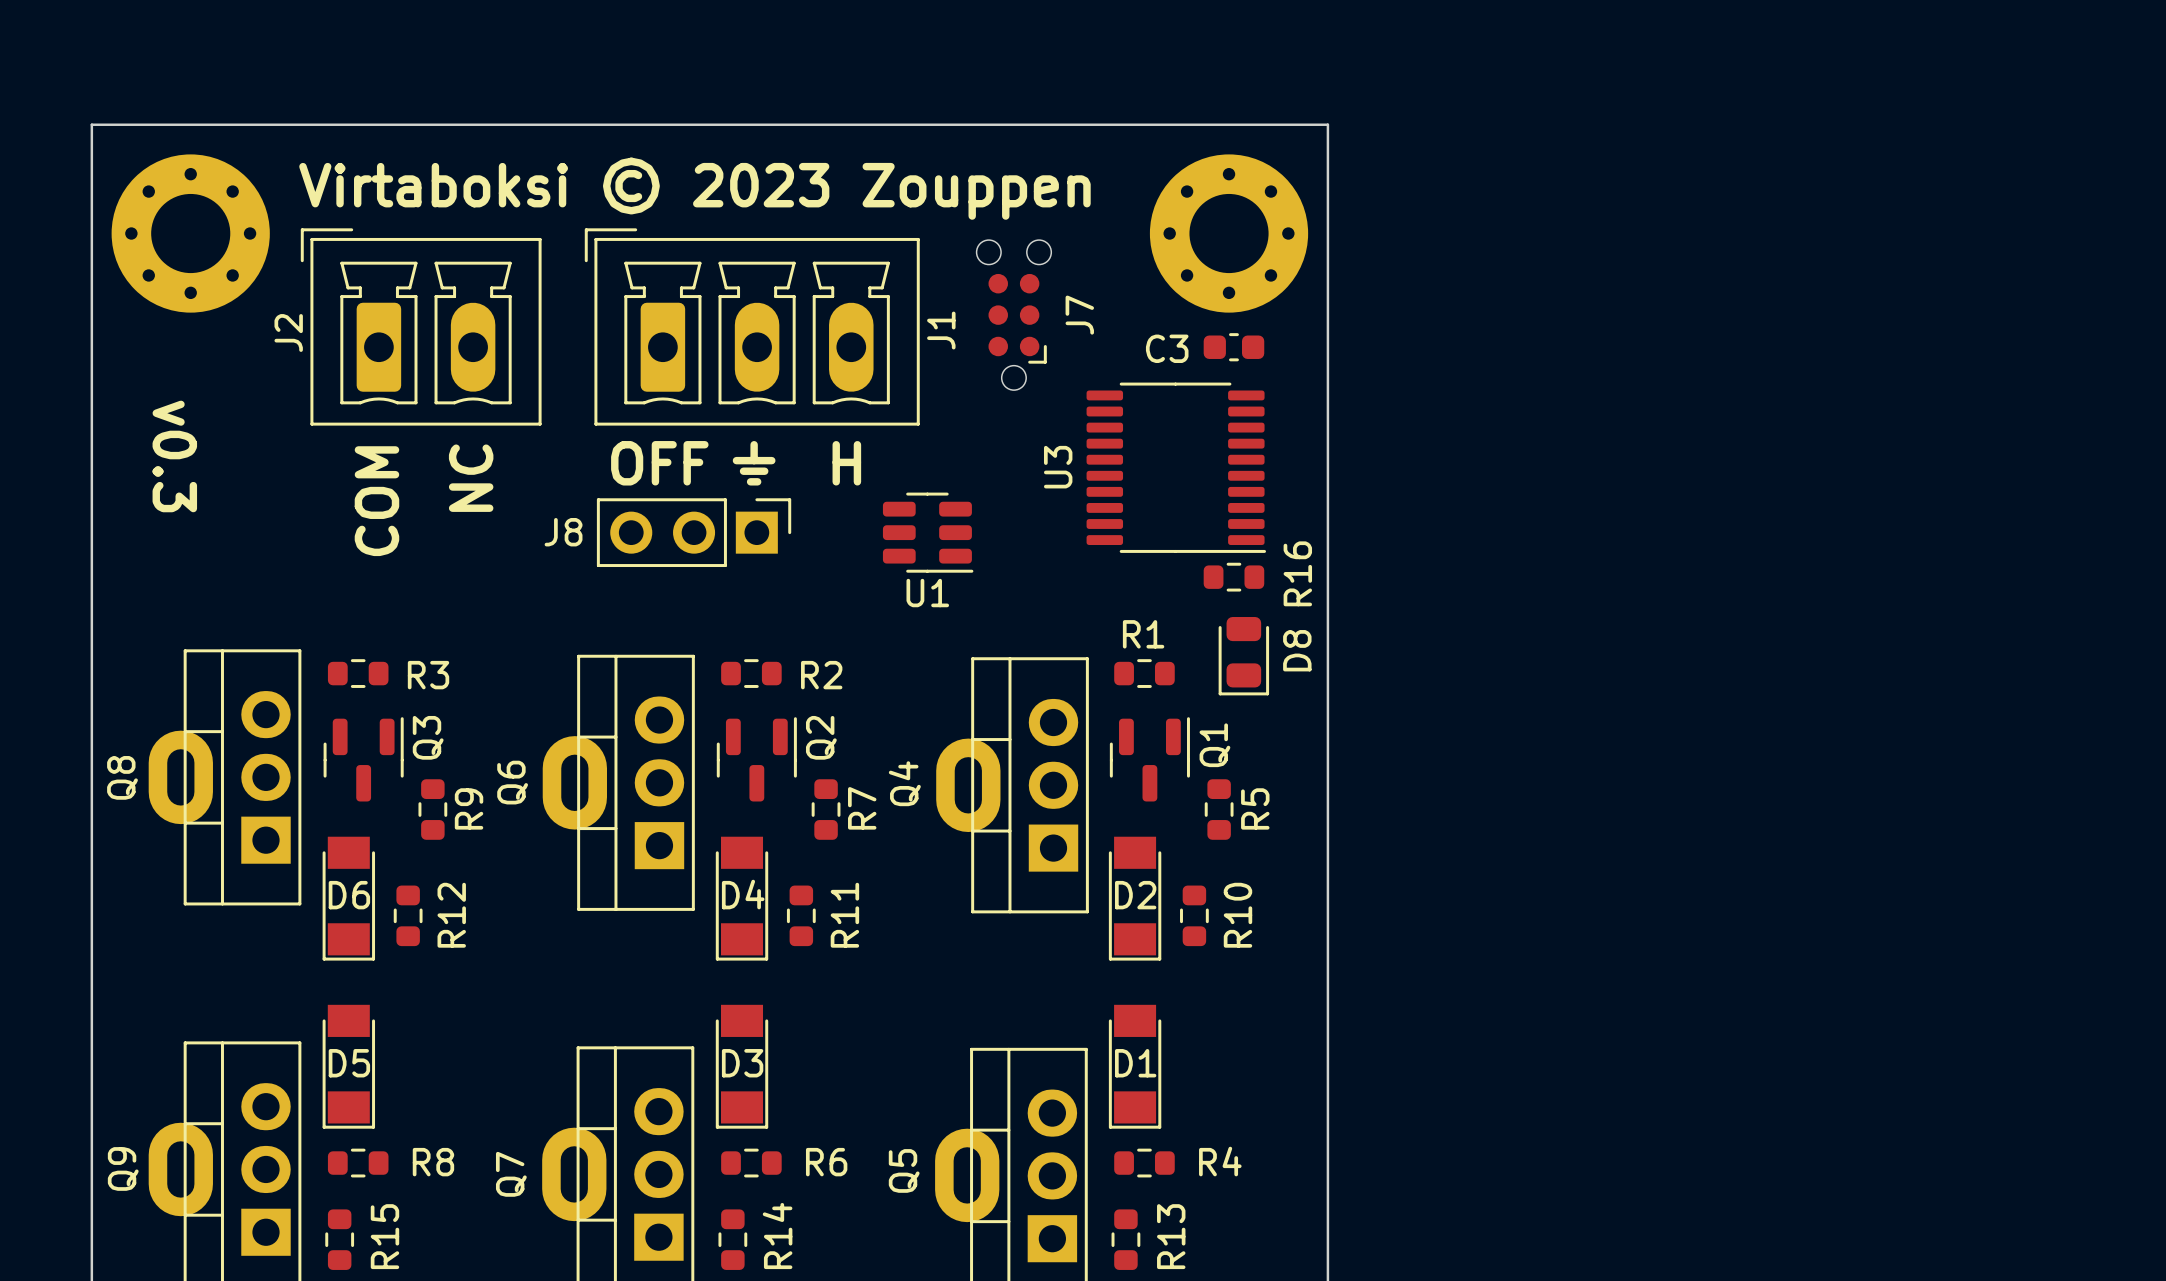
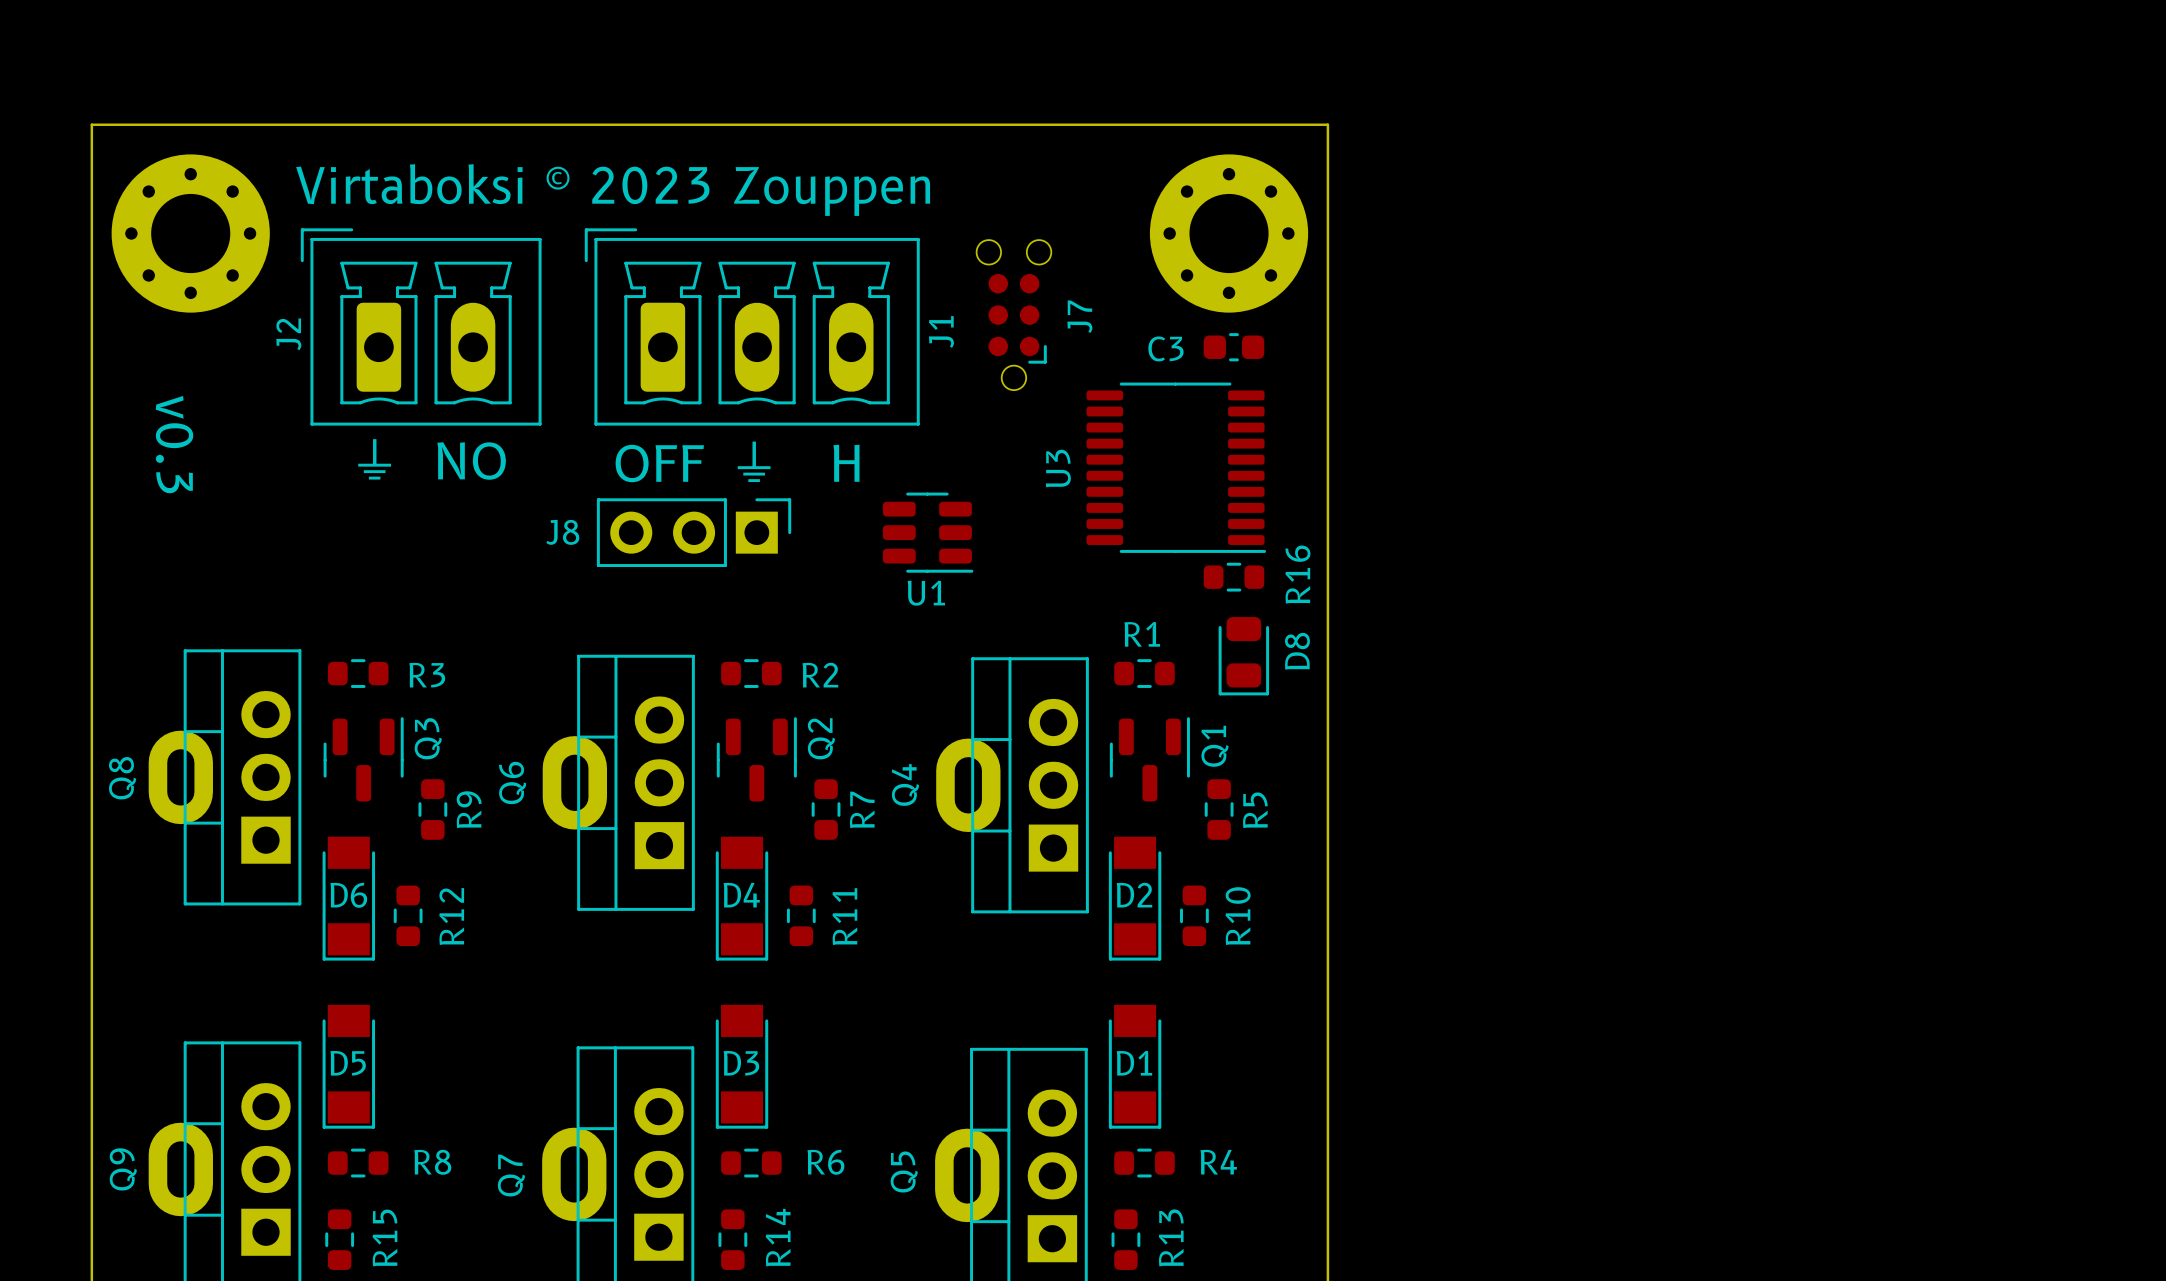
text: none -> ⏚ (374, 459)
text: none -> NO (471, 461)
text: NC (471, 478) -> none
text: COM (376, 501) -> none

